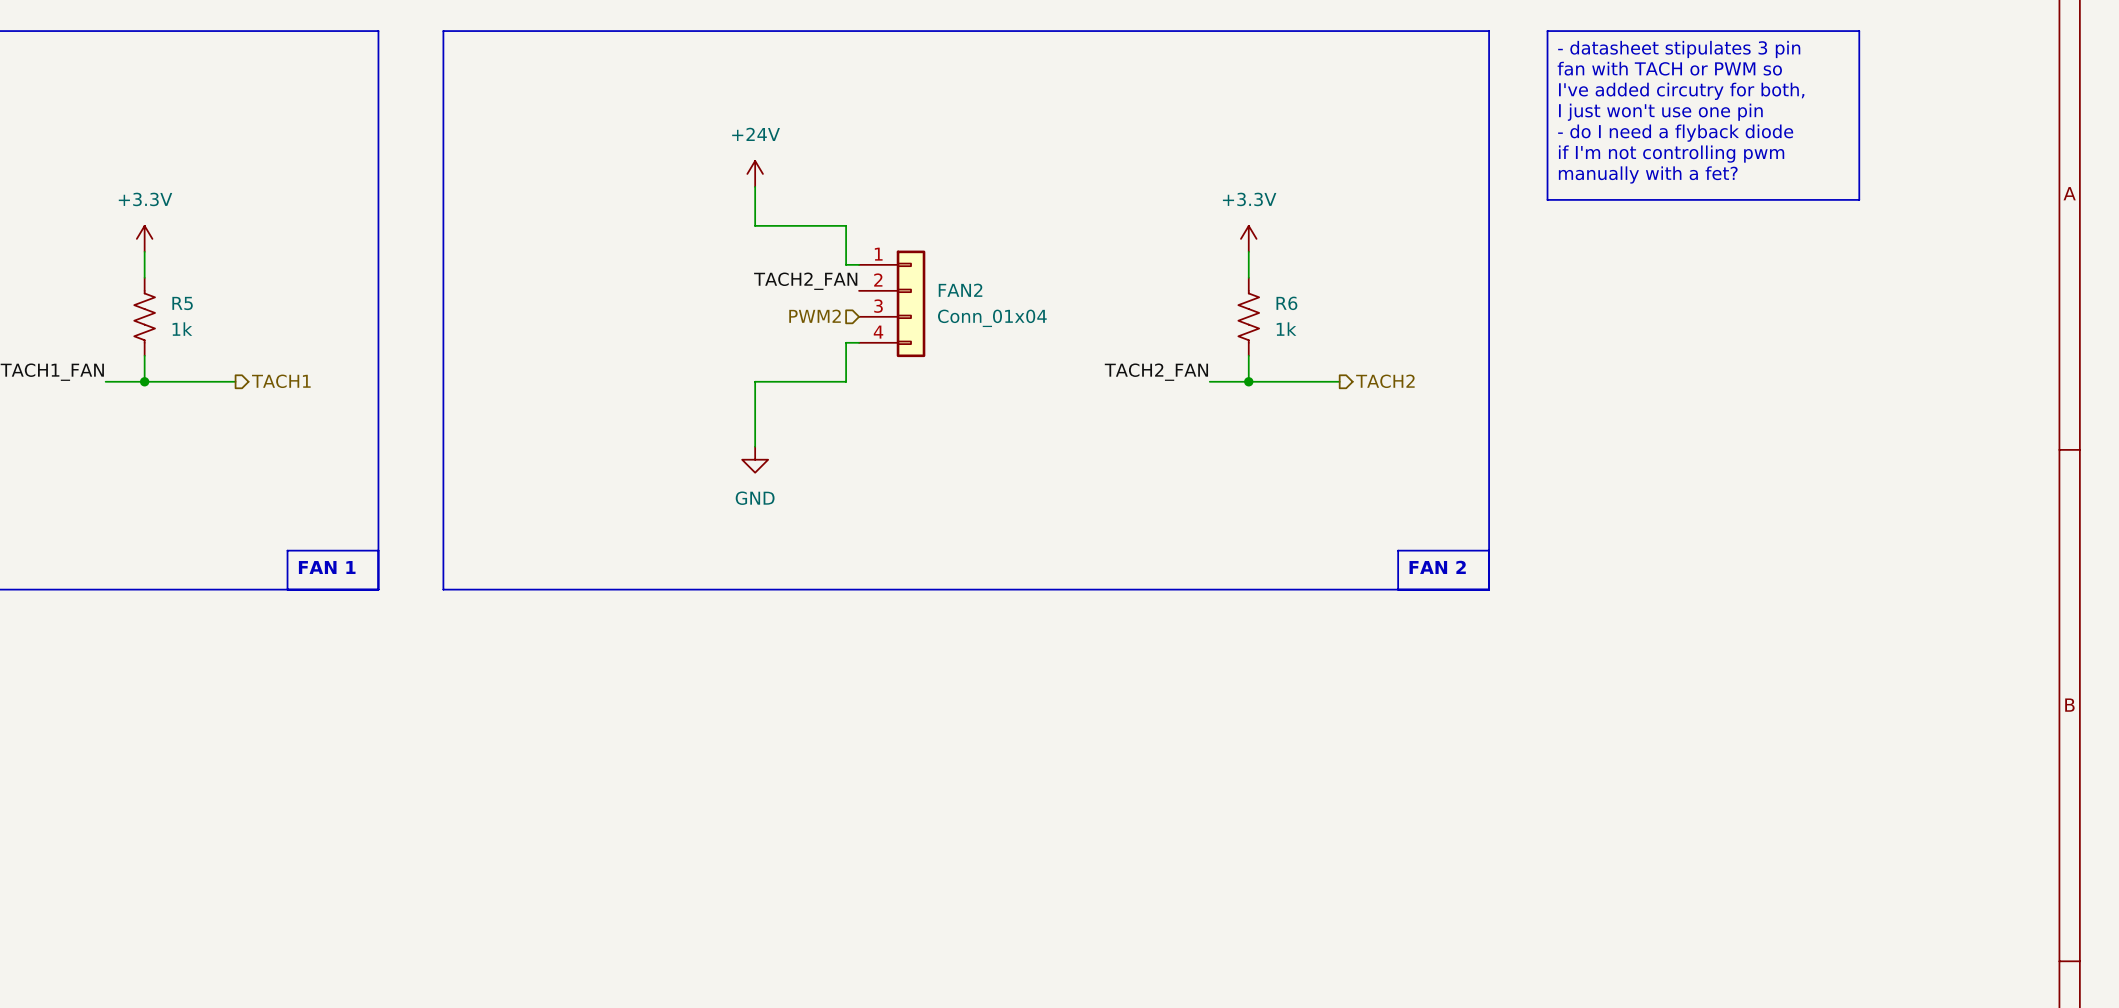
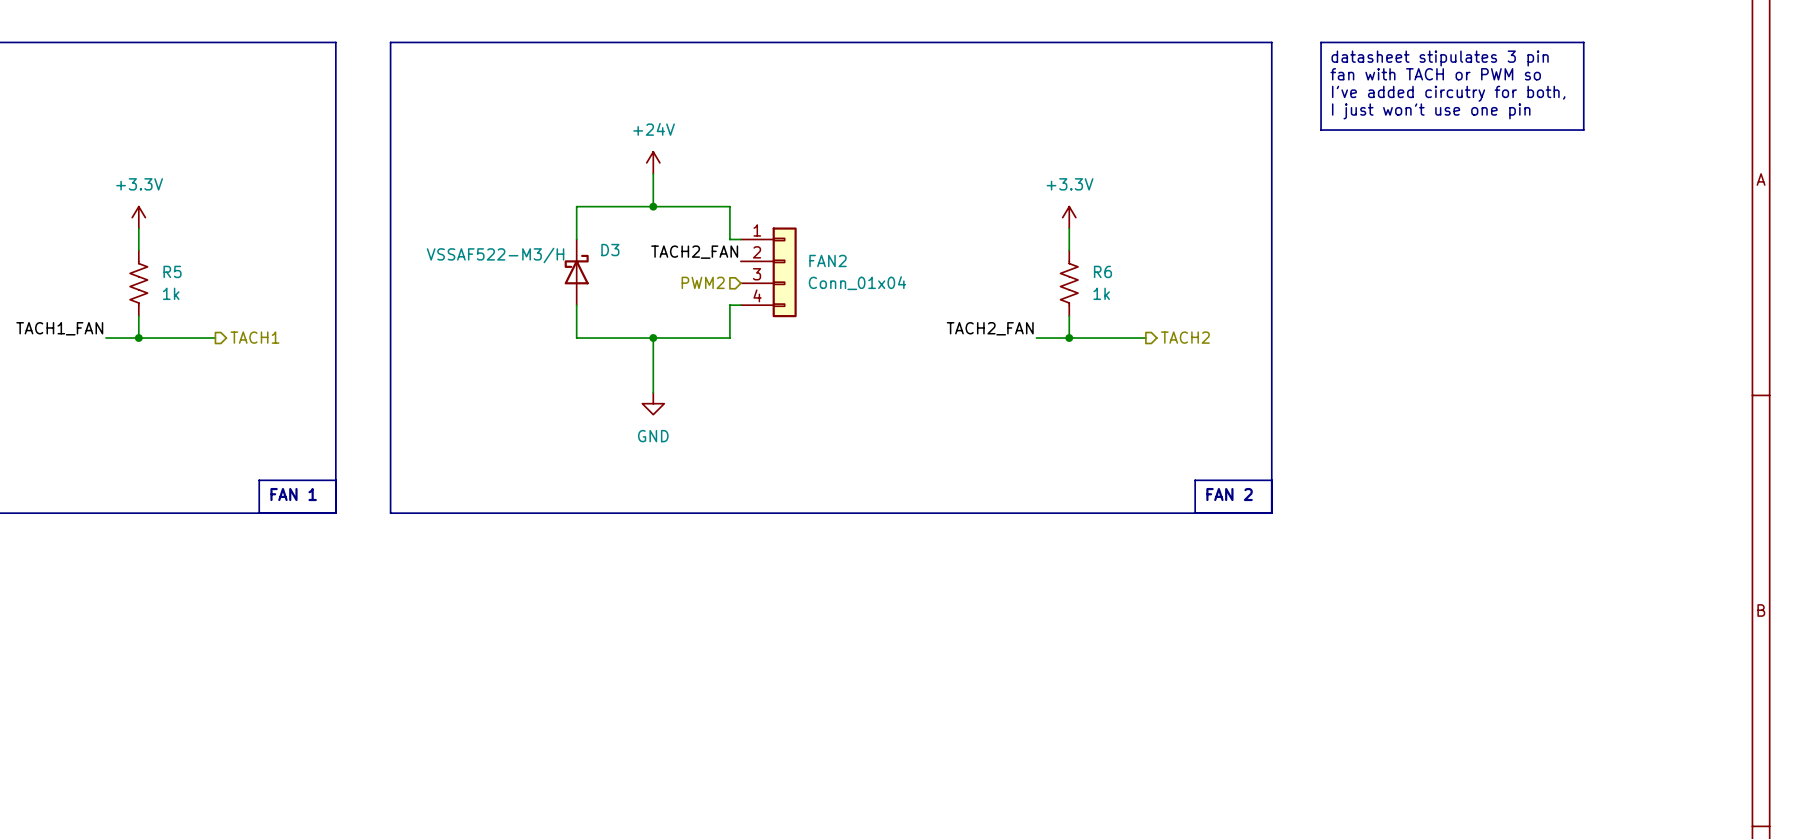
text: - datasheet stipulates 3 pin (1679, 49) -> datasheet stipulates 3 pin (1440, 58)
text: - do I need a flyback diode (1675, 133) -> none
line: (1547, 134) (1547, 199) (1859, 199) (1859, 134) -> (1321, 130) (1583, 130)
text: if I'm not controlling pwm (1671, 154) -> none
text: manually with a fet? (1648, 174) -> none
wire: none -> (653, 206) (576, 206) (576, 239)
junction: none -> (653, 206)
D3: none -> VSSAF522-M3/H (576, 272)
wire: none -> (576, 305) (576, 338) (653, 338)
junction: none -> (653, 338)

